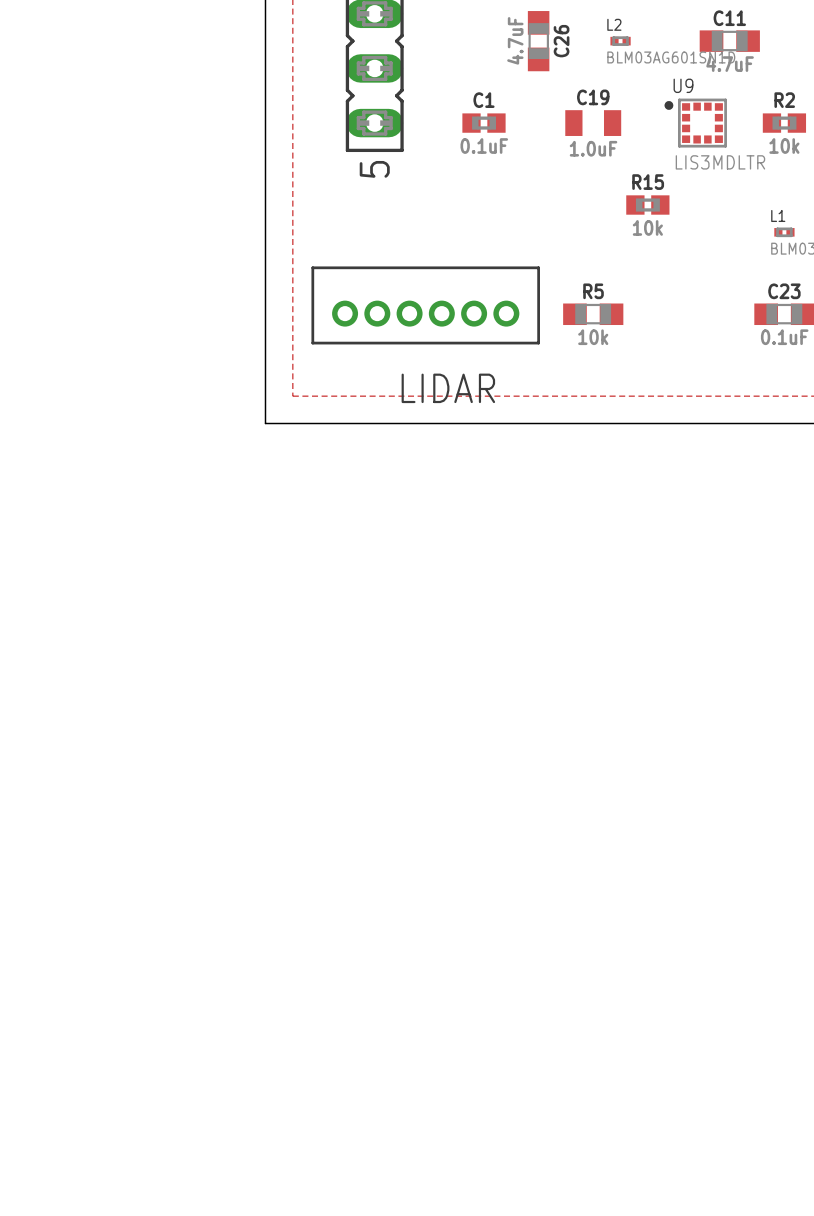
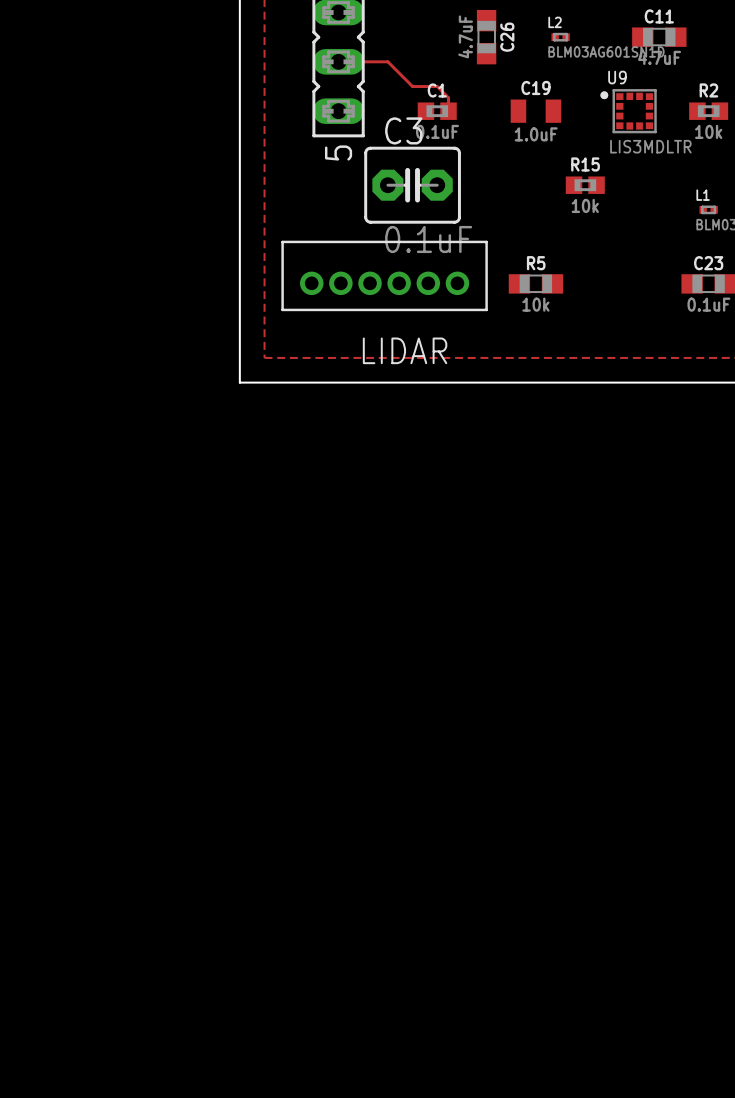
track: none -> (338, 61) (387, 61) (412, 86) (437, 86) (448, 97) (448, 111)
C3: none -> 0.1uF (412, 185)

